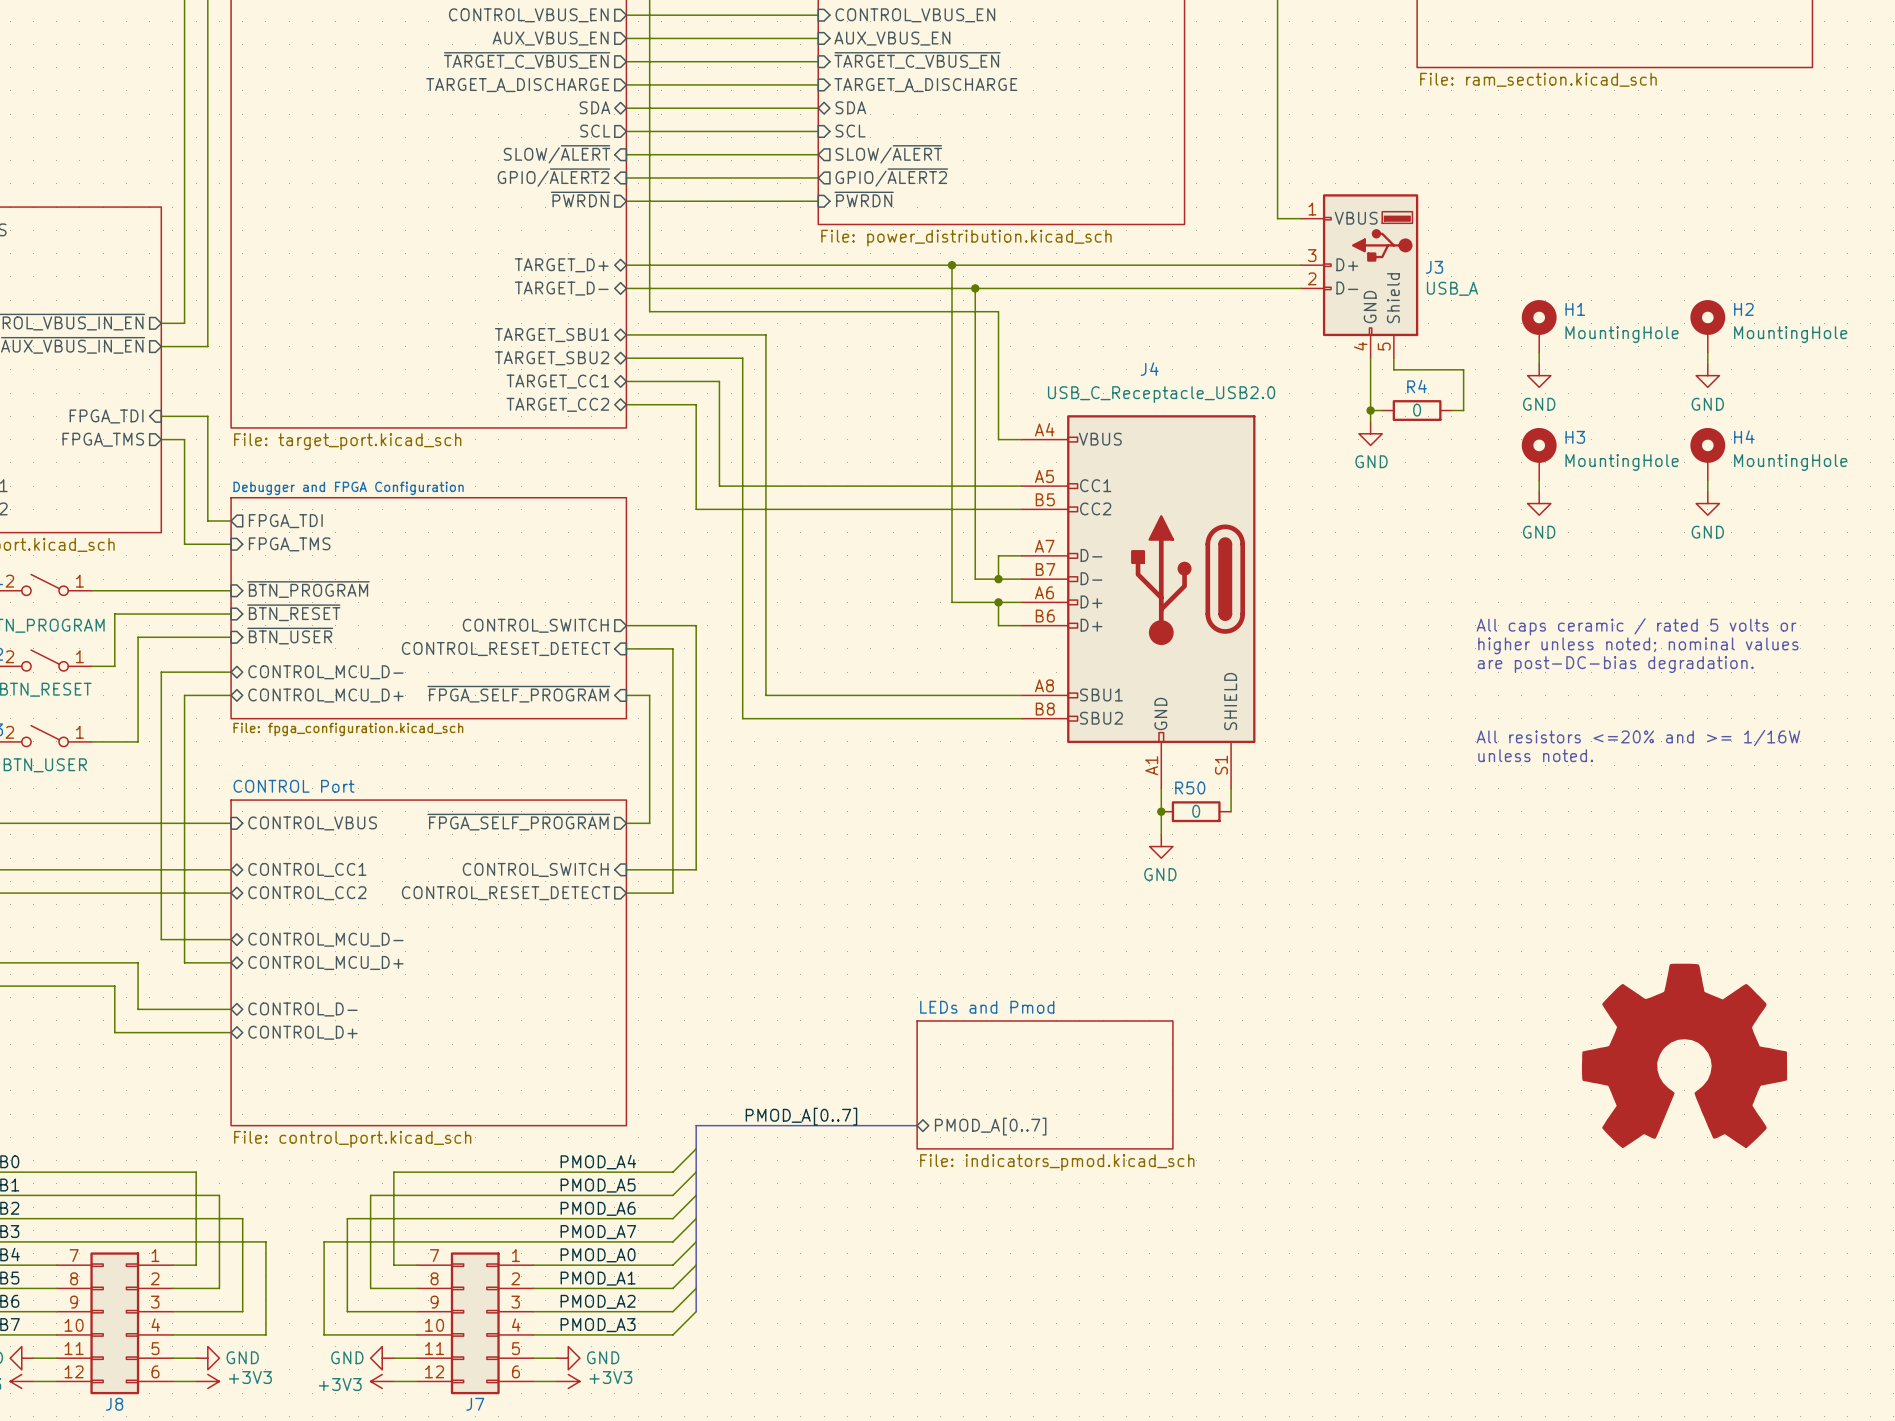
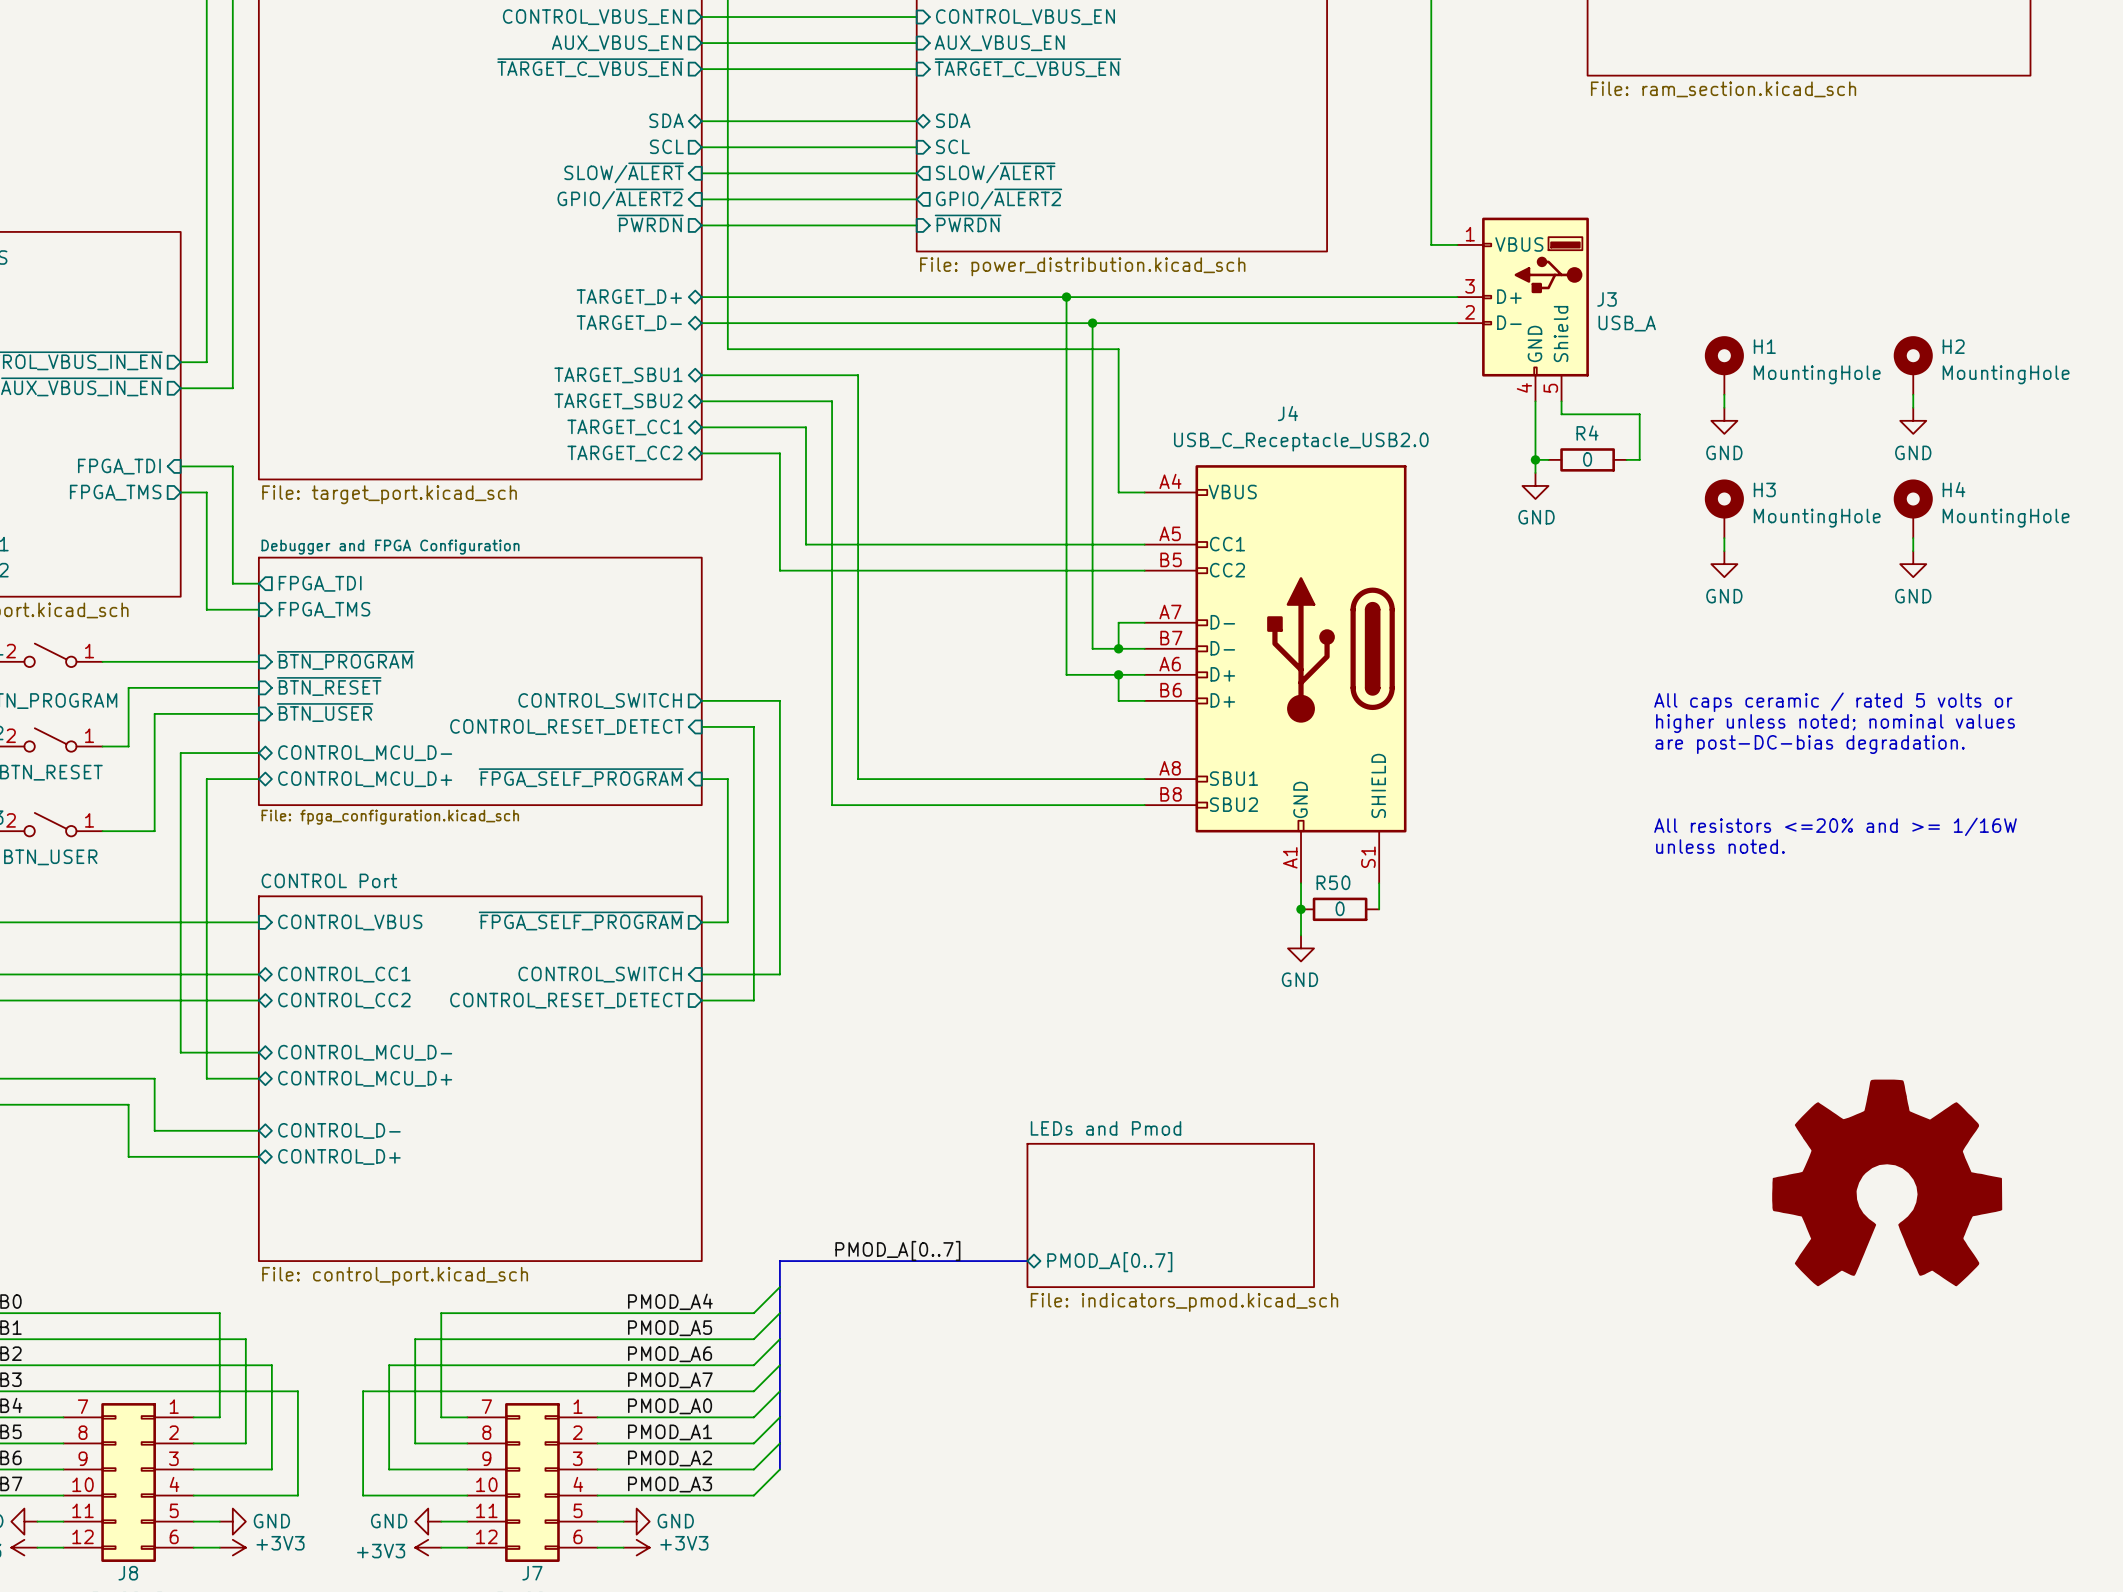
wire: (626, 84) (818, 84) -> none
sheet pin: TARGET_A_DISCHARGE (517, 85) -> none
sheet pin: TARGET_A_DISCHARGE (925, 85) -> none

